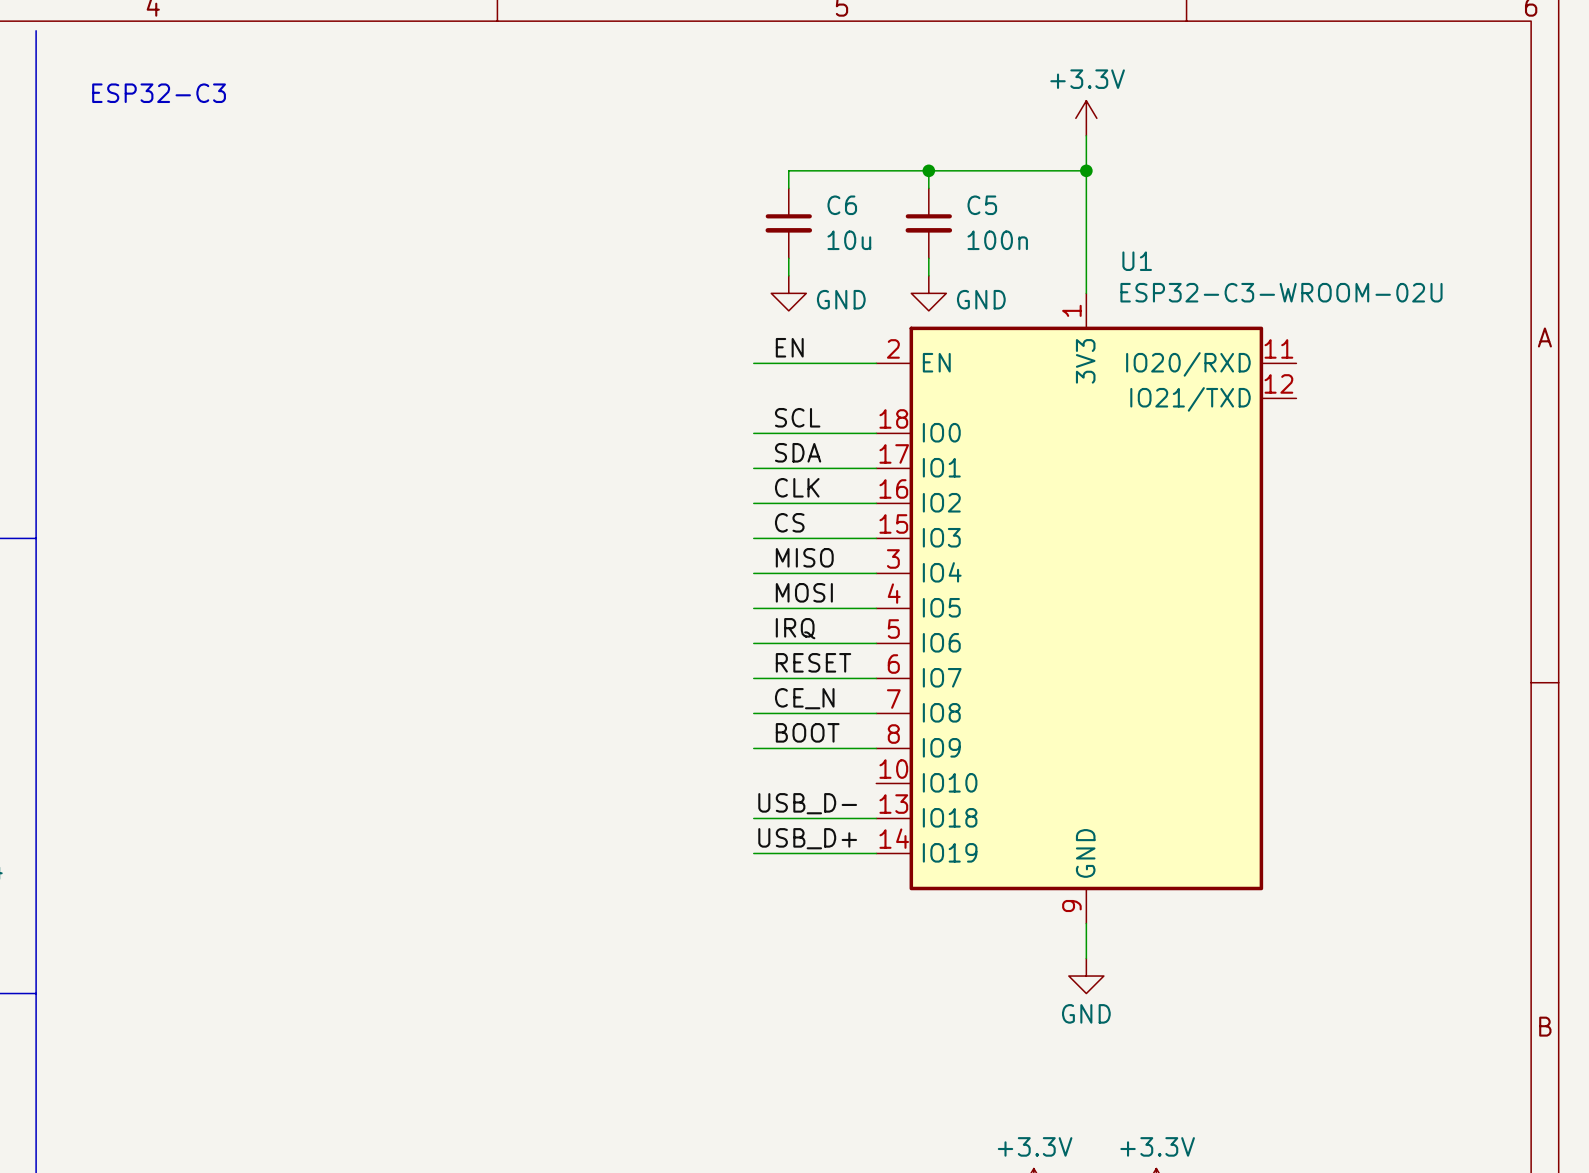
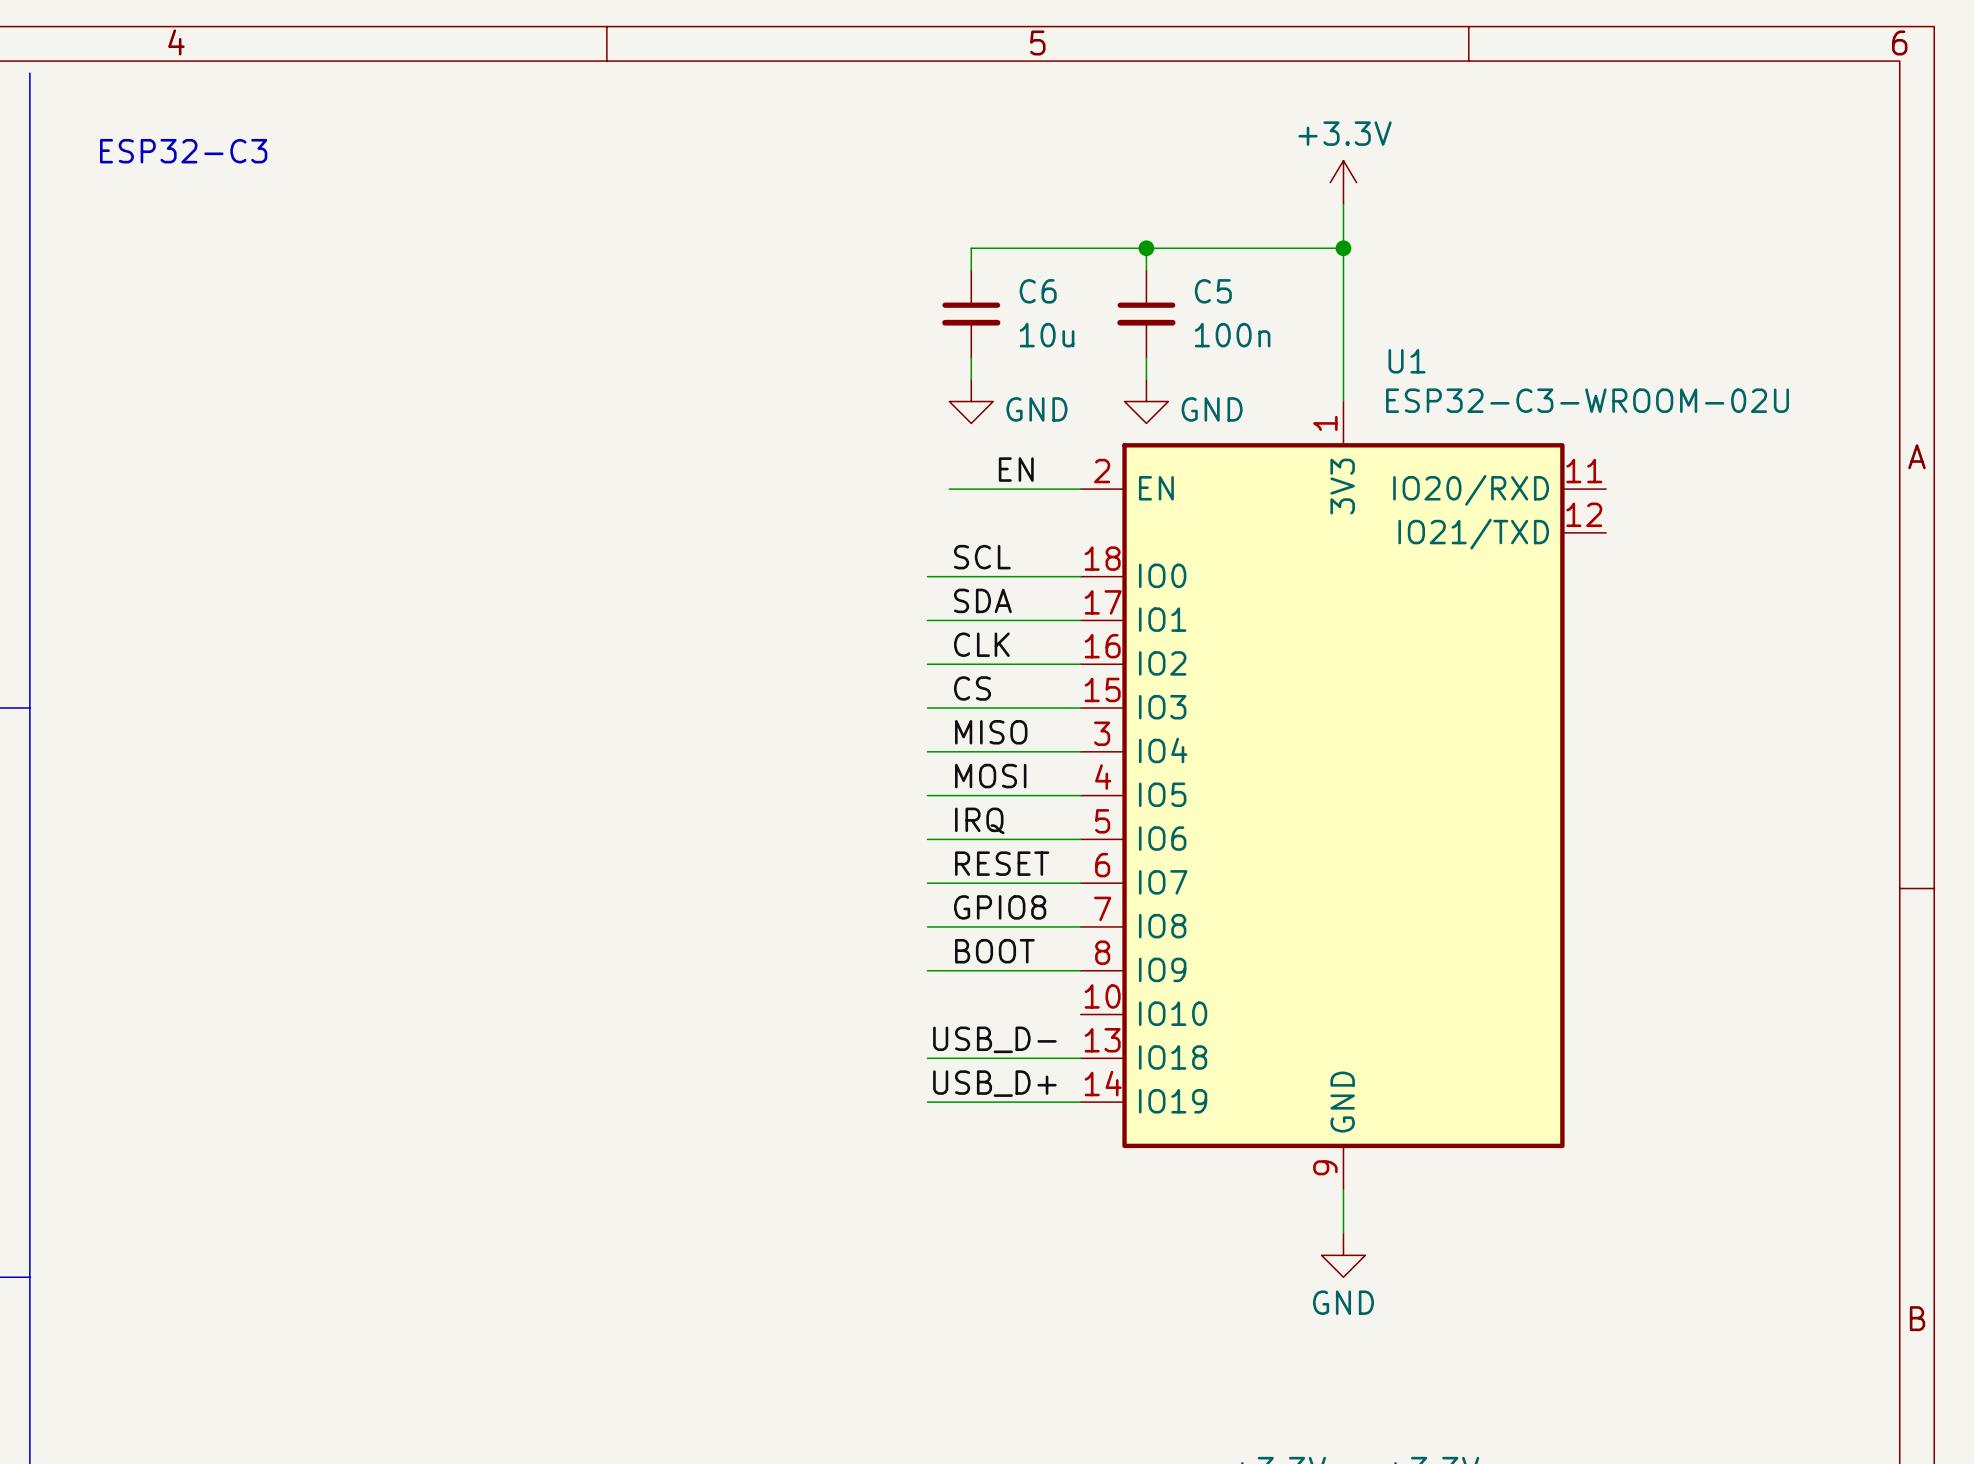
label position: EN (789, 347) -> EN (1016, 469)
wire: (753, 363) (771, 363) -> none
label: CE_N (804, 698) -> GPIO8 (1000, 907)

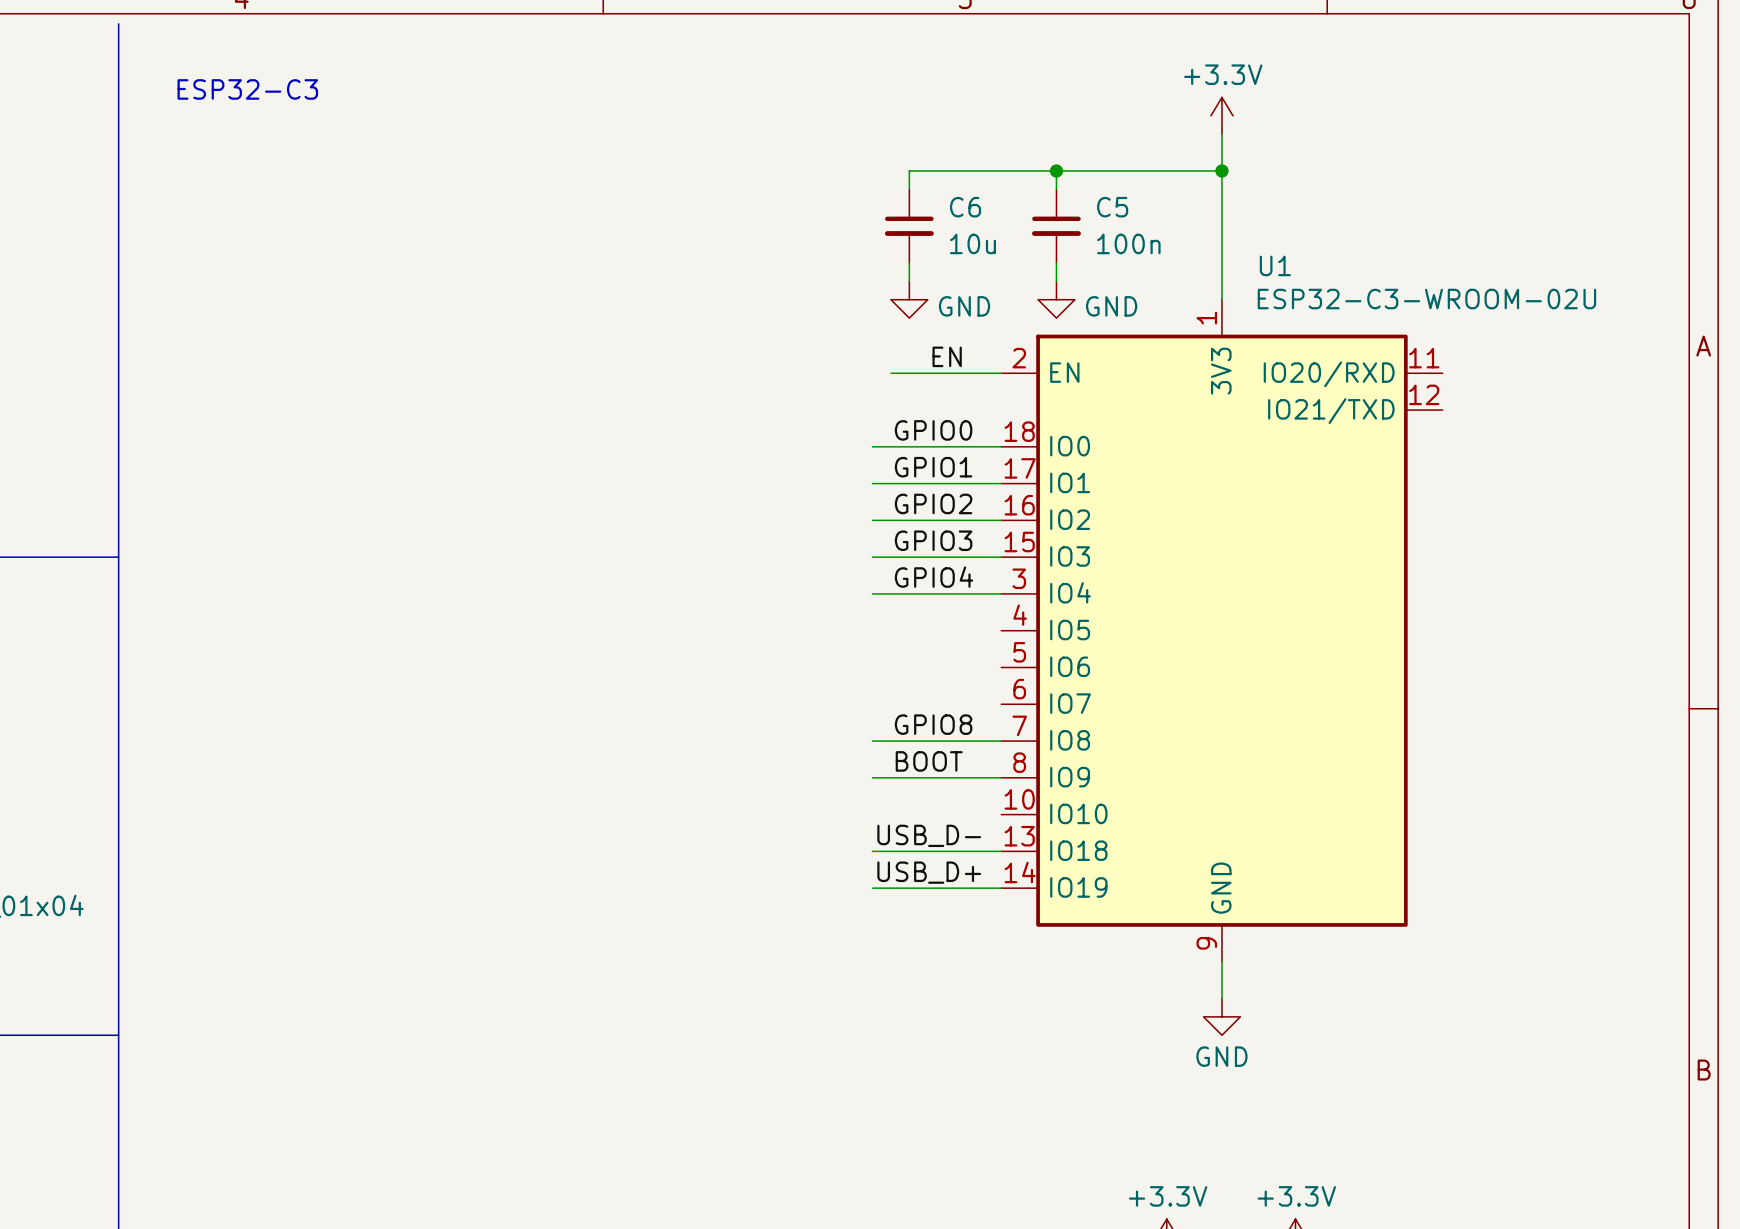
label: SCL (982, 557) -> GPIO0 (933, 430)
label: SDA (982, 600) -> GPIO1 (933, 467)
label: CLK (981, 644) -> GPIO2 (933, 503)
label: CS (972, 688) -> GPIO3 (933, 540)
label: MISO (991, 732) -> GPIO4 (934, 577)
label: MOSI (990, 776) -> none
wire: (927, 795) (1080, 795) -> none
label: IRQ (979, 820) -> none
wire: (927, 839) (1080, 839) -> none
label: RESET (1002, 863) -> none
wire: (927, 883) (1080, 883) -> none

